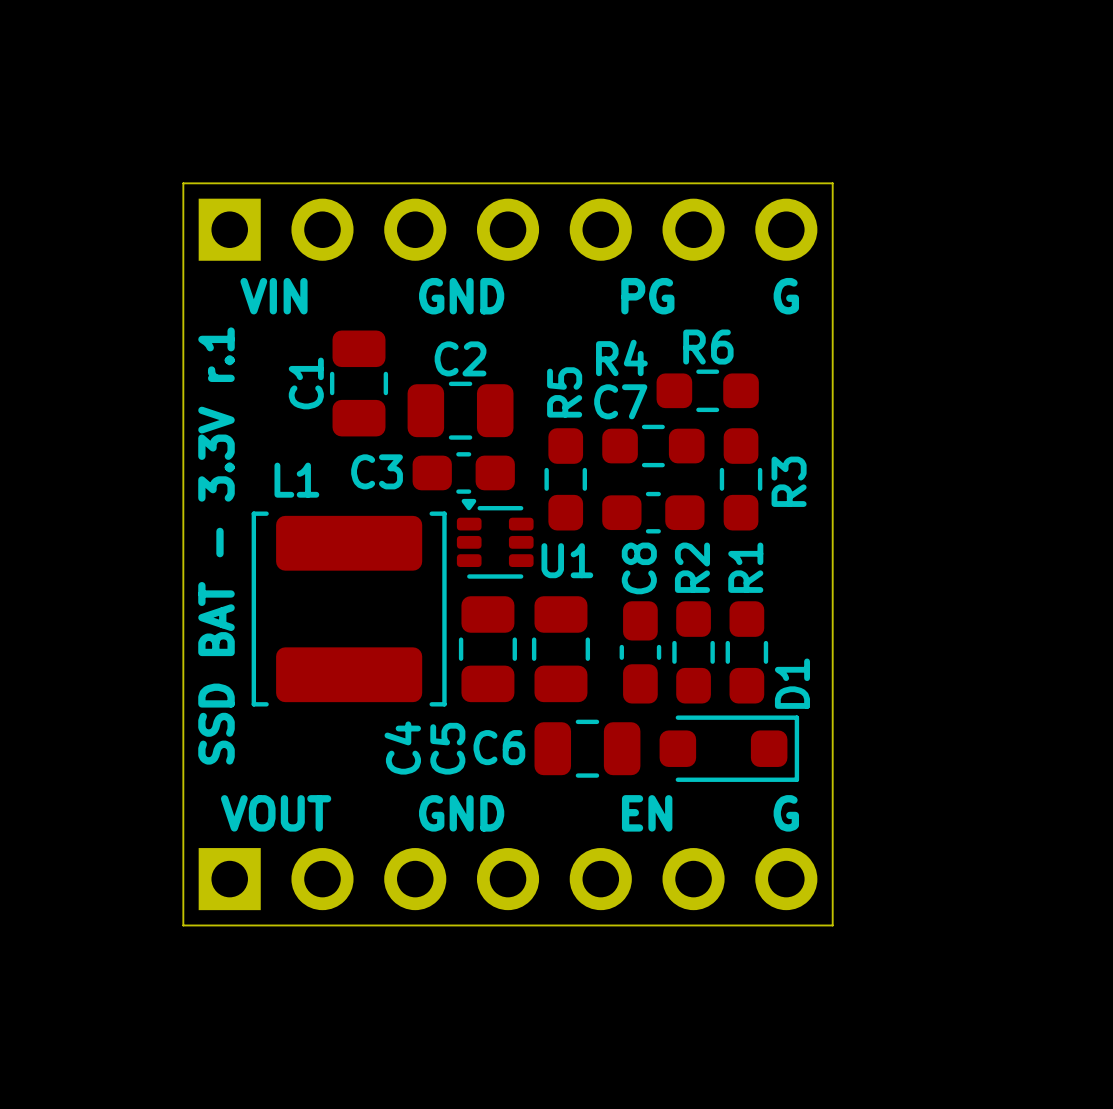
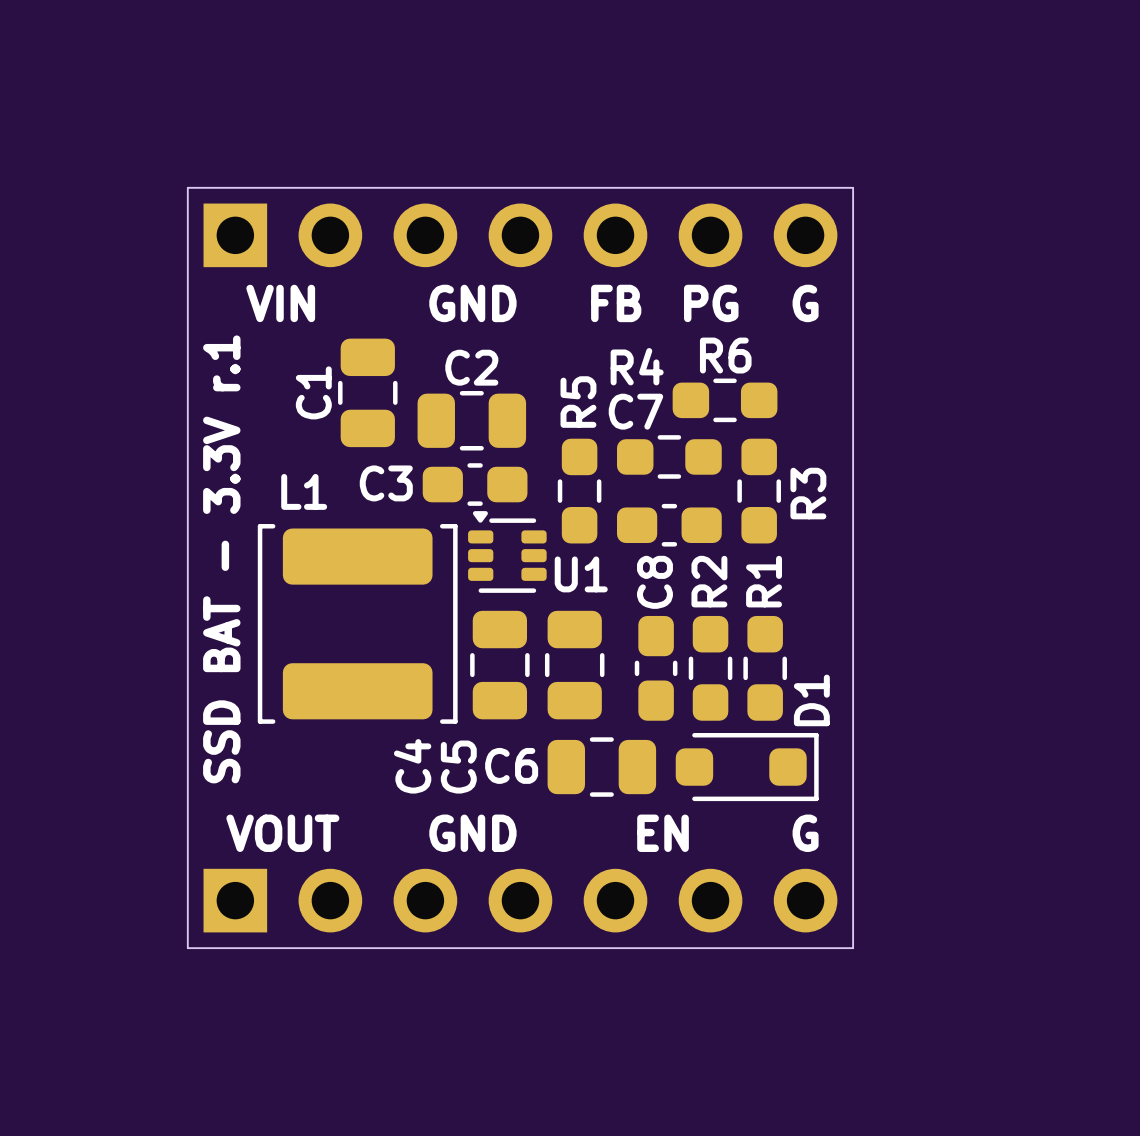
text: none -> FB (616, 303)
text position: PG (647, 296) -> PG (711, 303)

